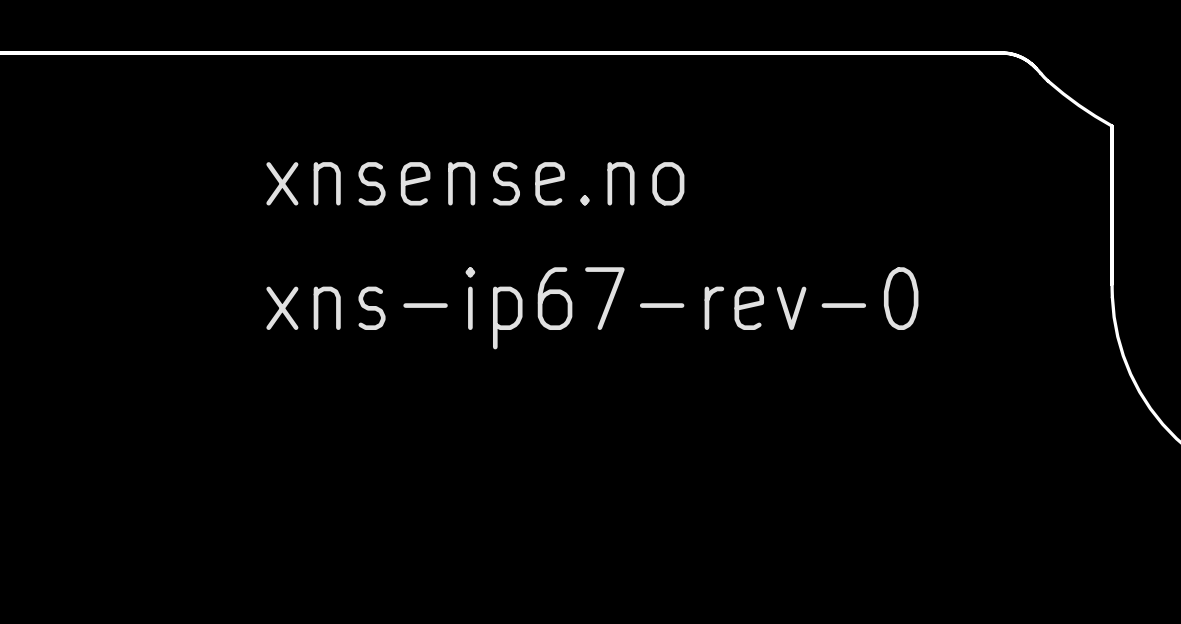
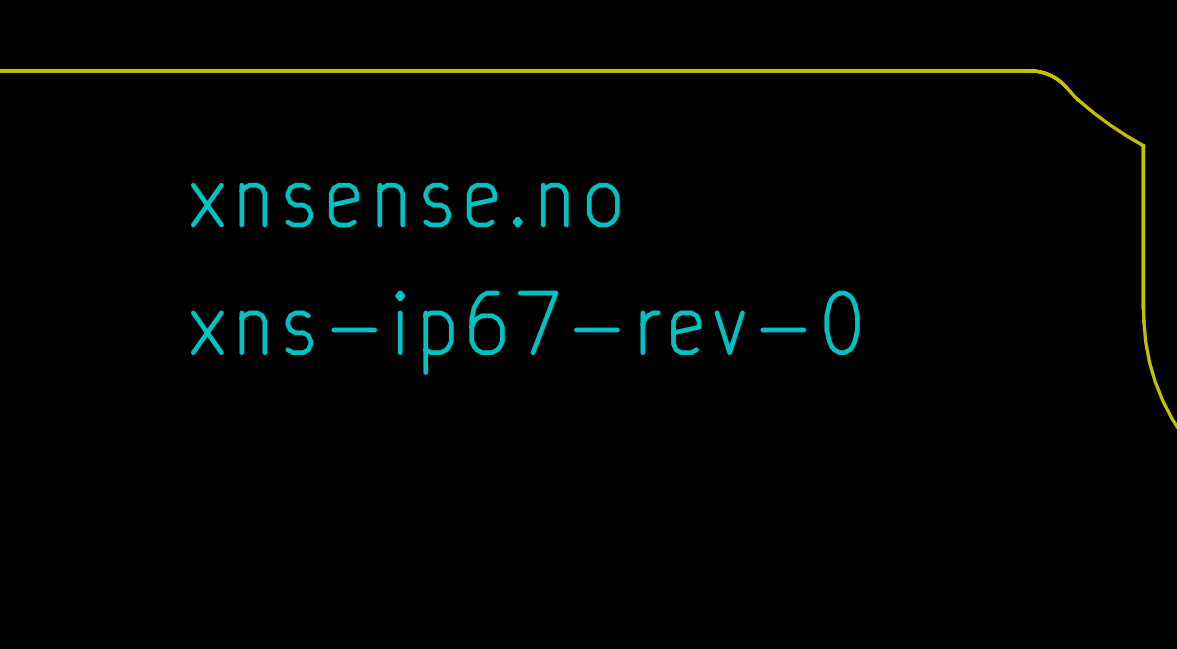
text position: xnsense.no (475, 183) -> xnsense.no (405, 205)
text position: xns-ip67-rev-0 (592, 308) -> xns-ip67-rev-0 (525, 332)

